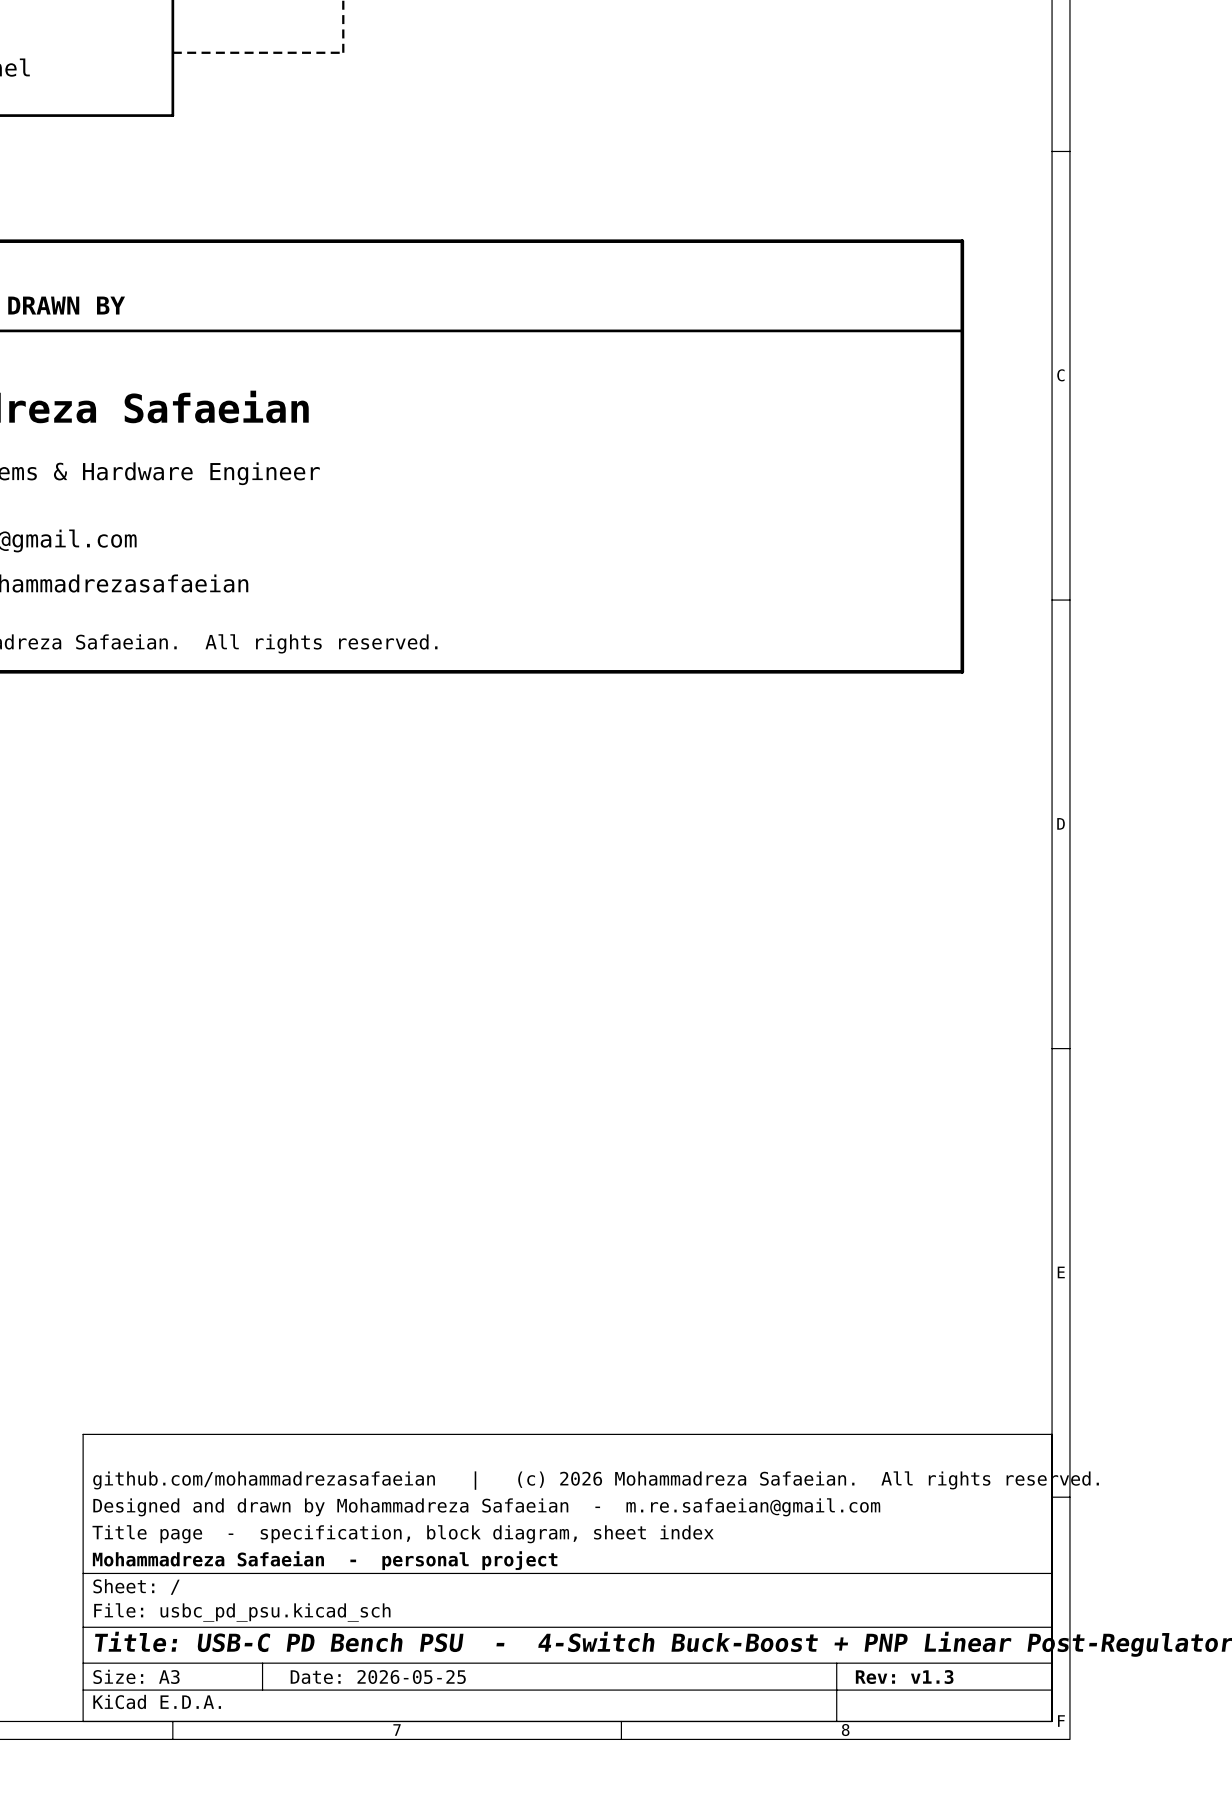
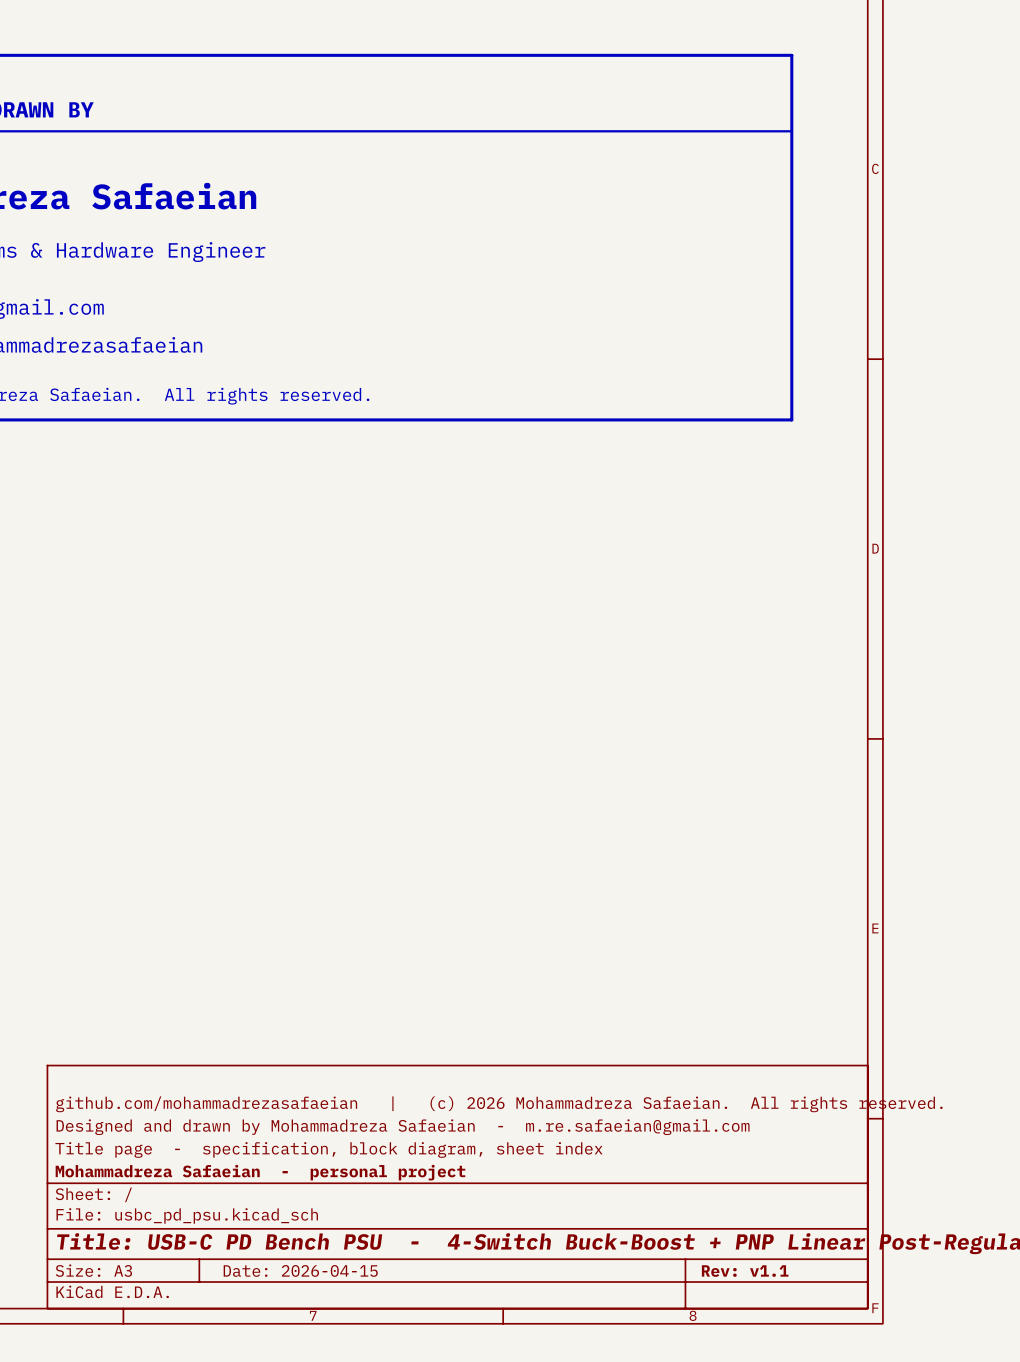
title block: Date: 2026-05-25 (378, 1677) -> Date: 2026-04-15 (300, 1270)
title block: Rev: v1.3 (904, 1677) -> Rev: v1.1 (745, 1271)

